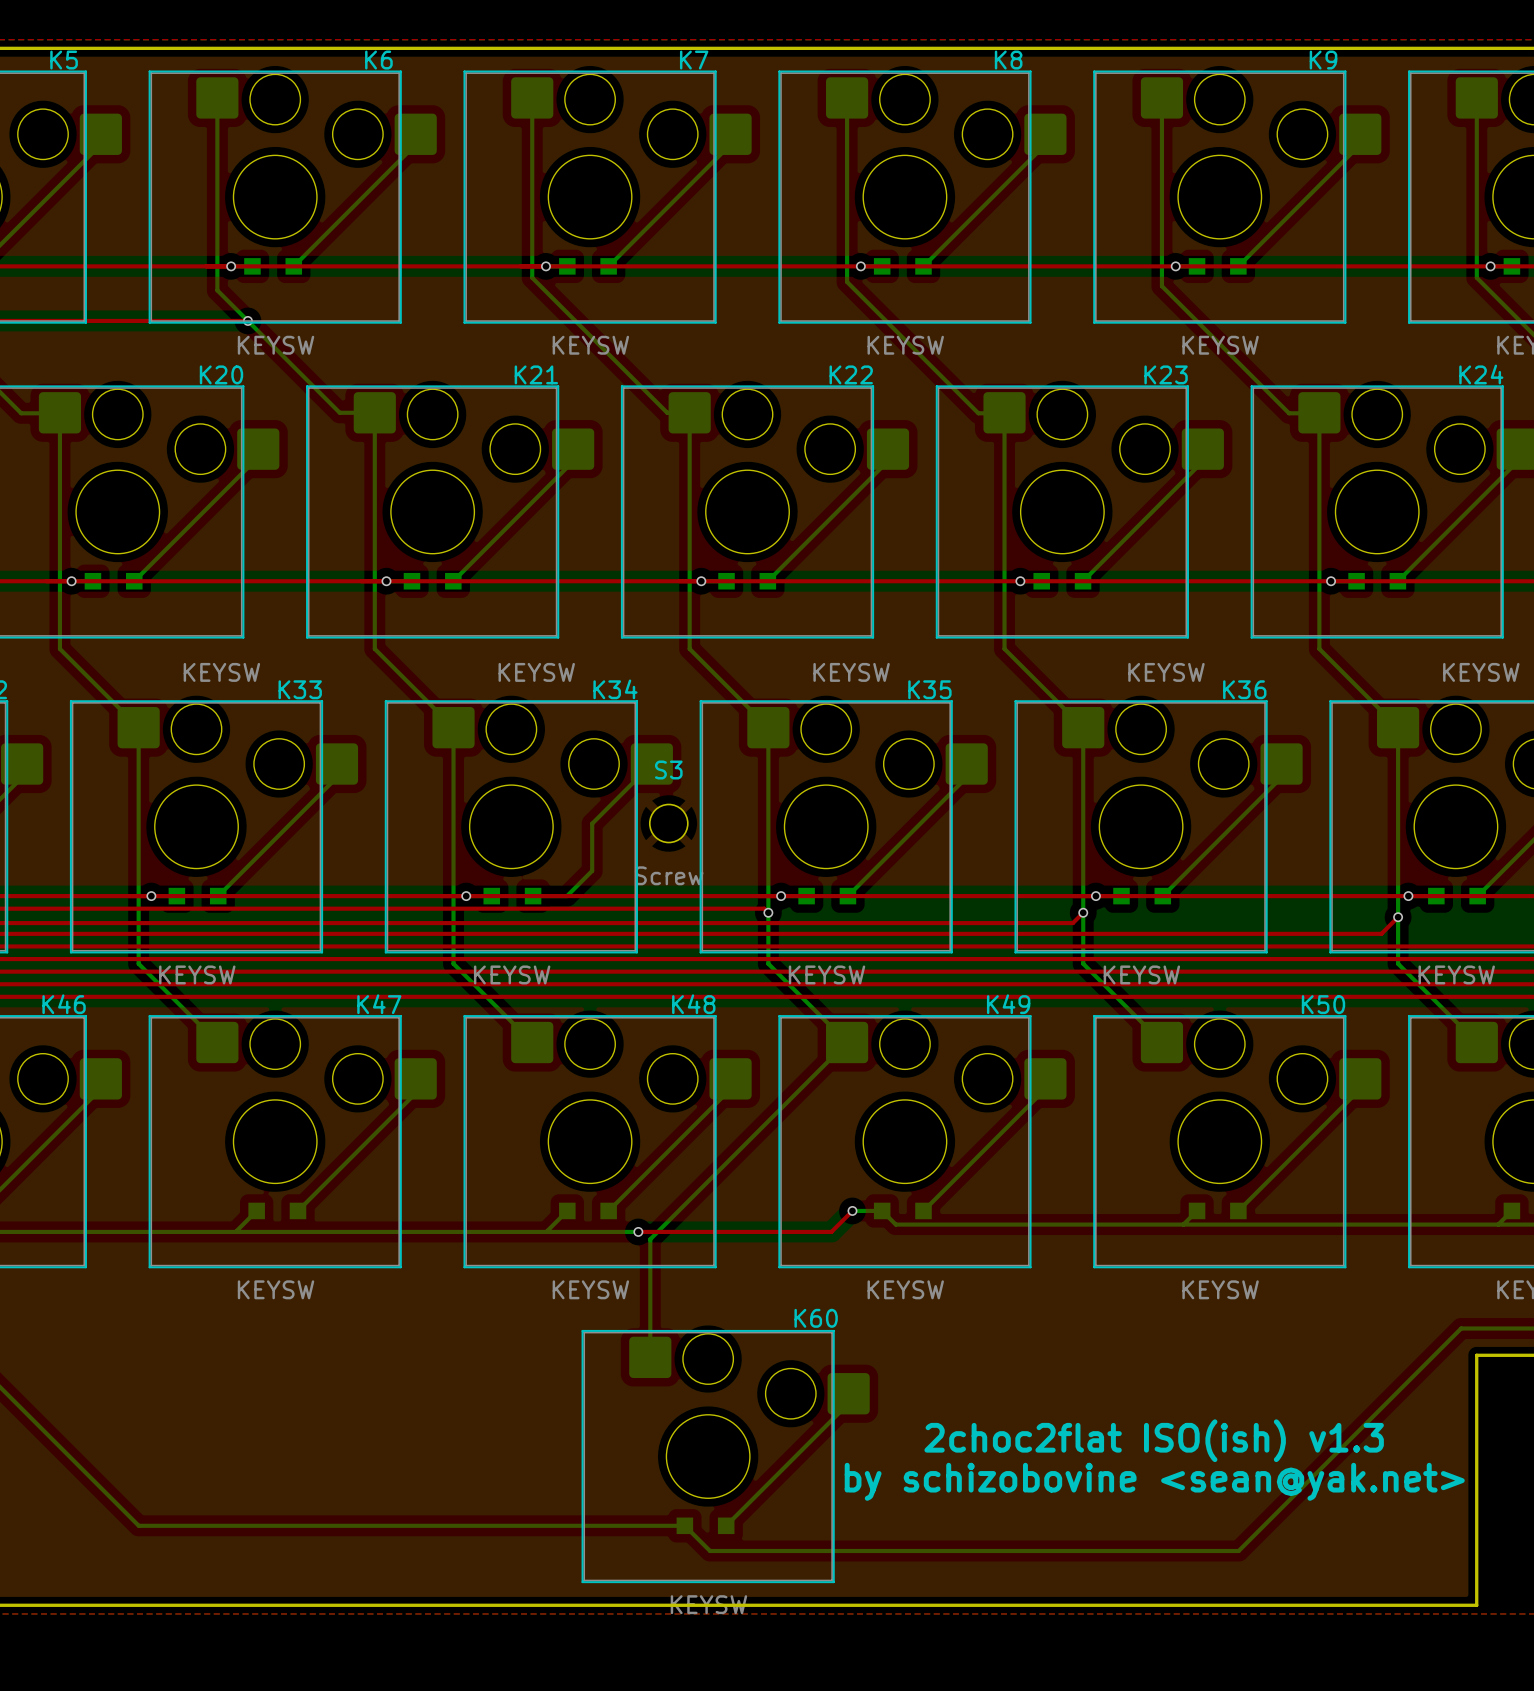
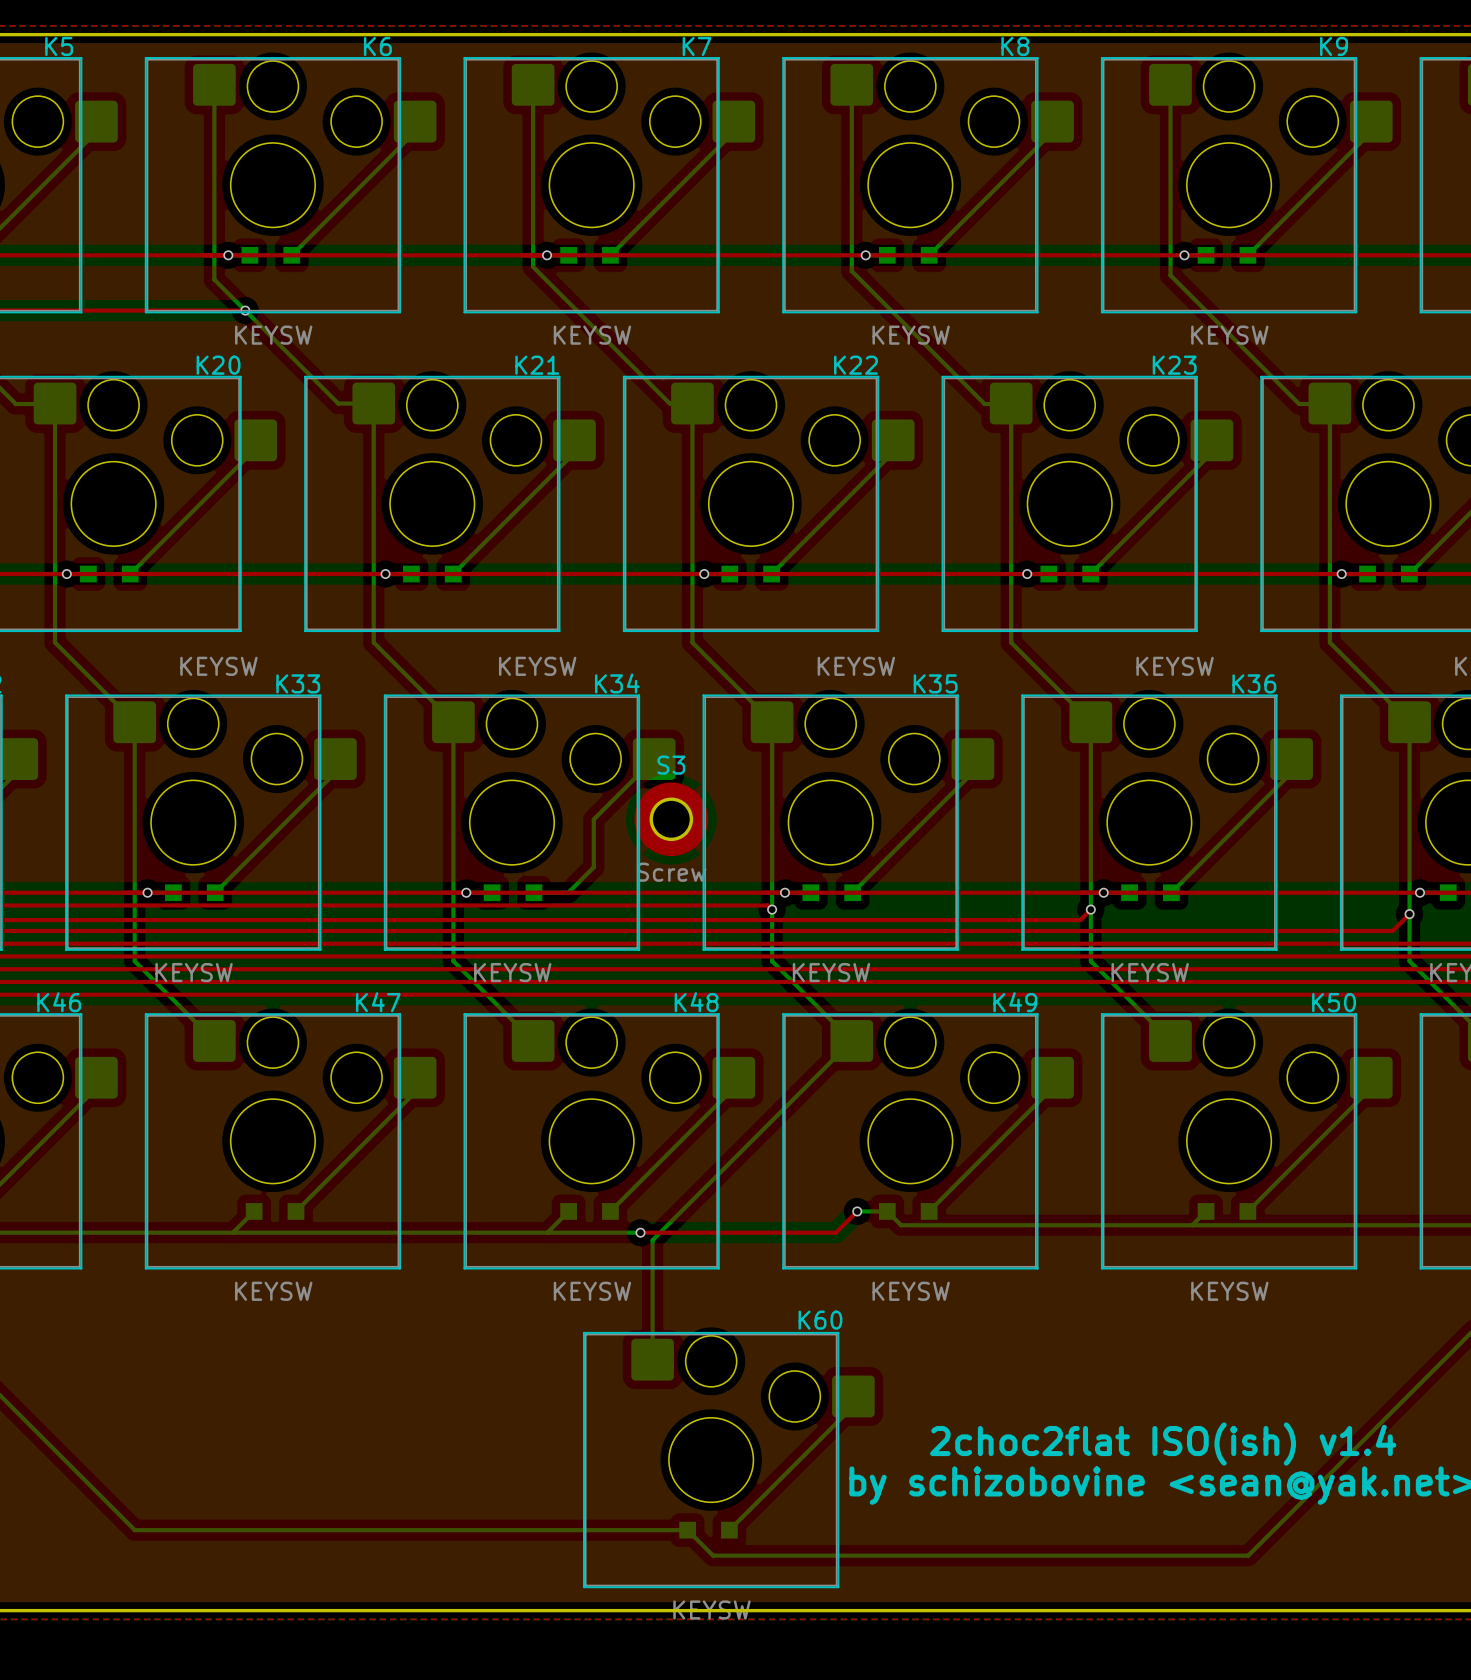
S3 footprint: [648, 803, 689, 844] -> [634, 782, 709, 857]
text: 2choc2flat ISO(ish) v1.3 (1154, 1440) -> 2choc2flat ISO(ish) v1.4 (1163, 1444)

